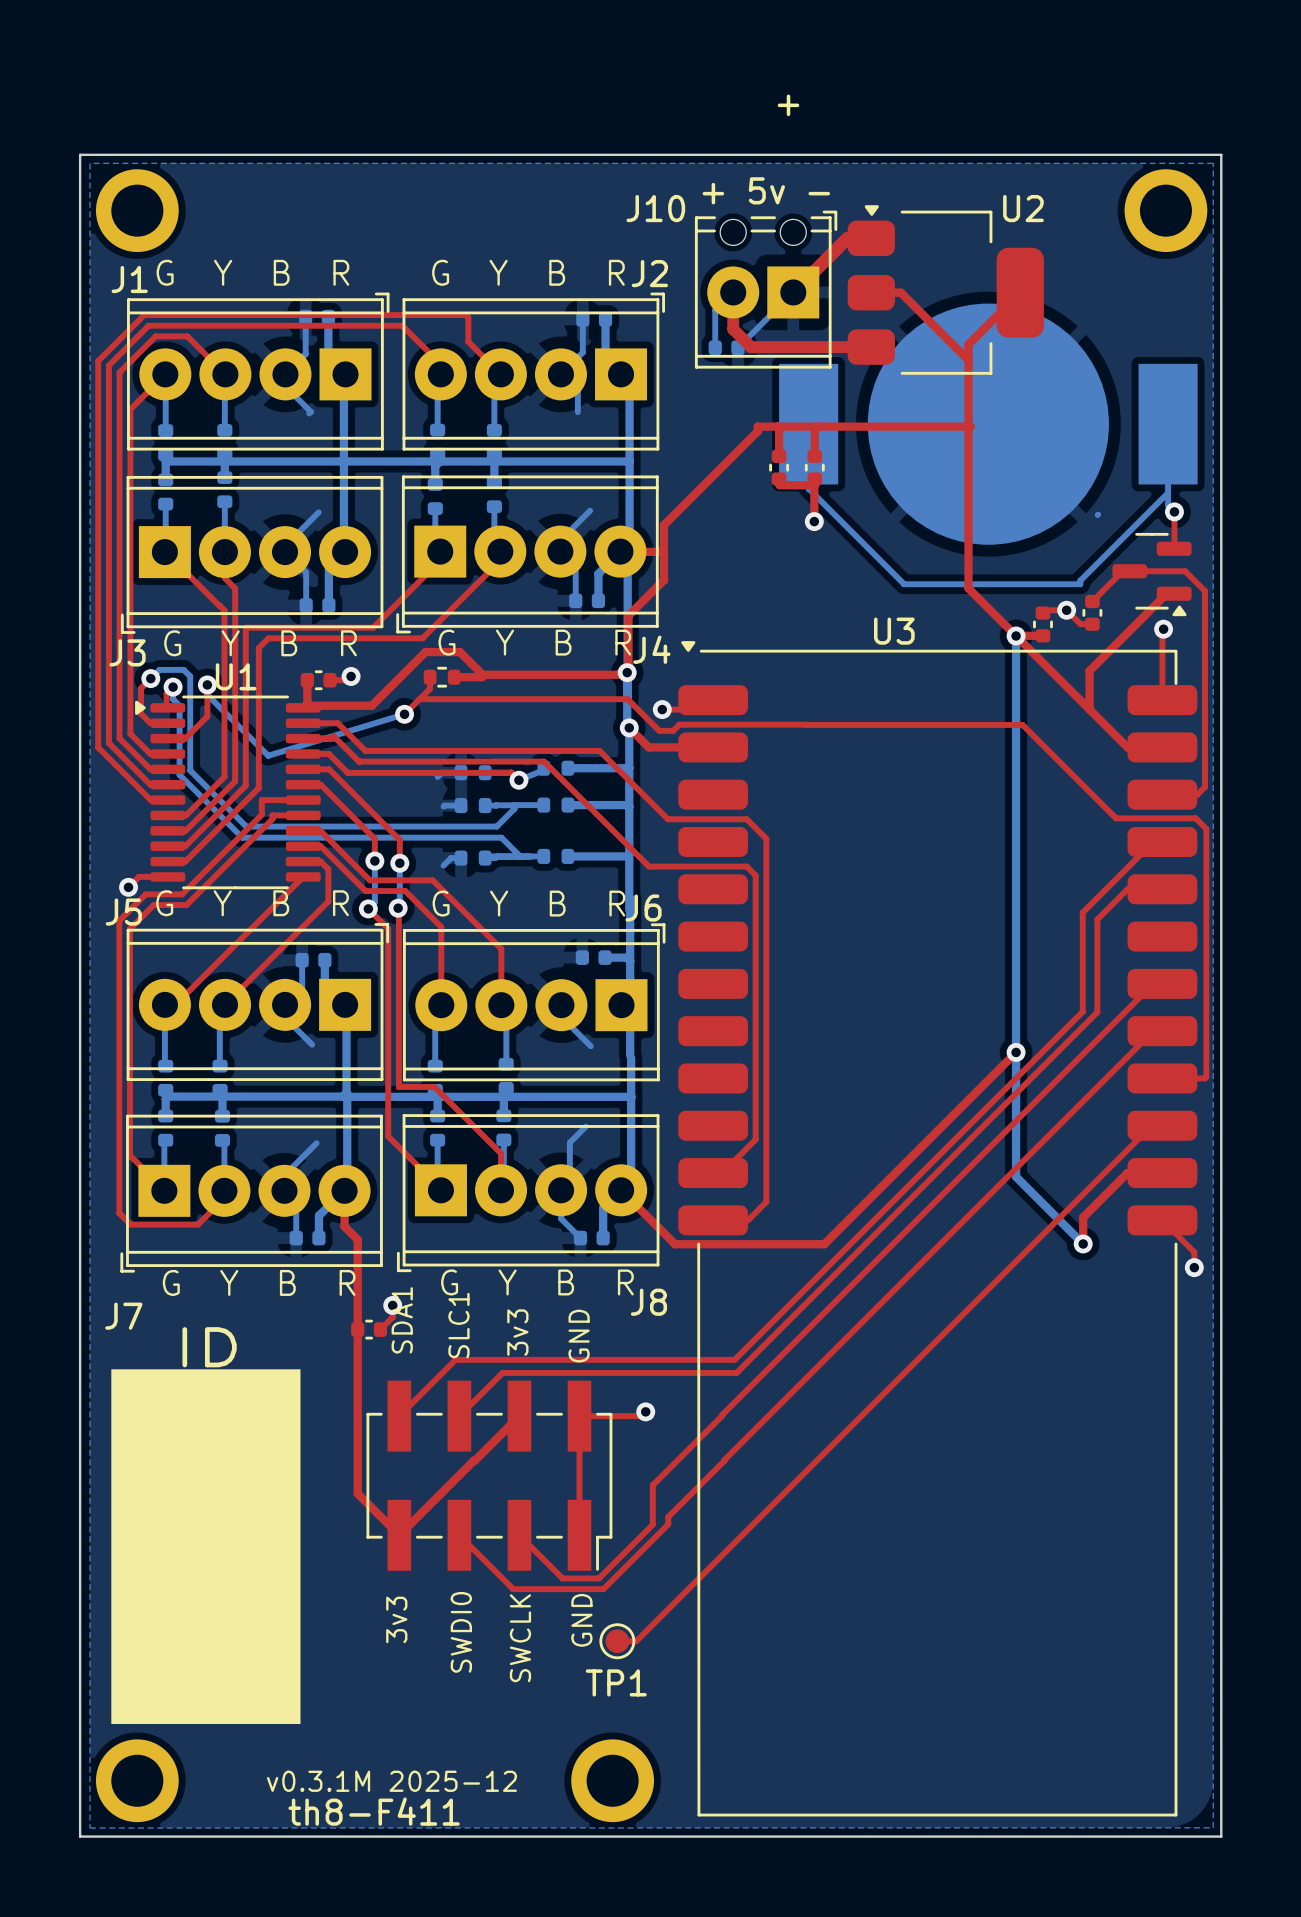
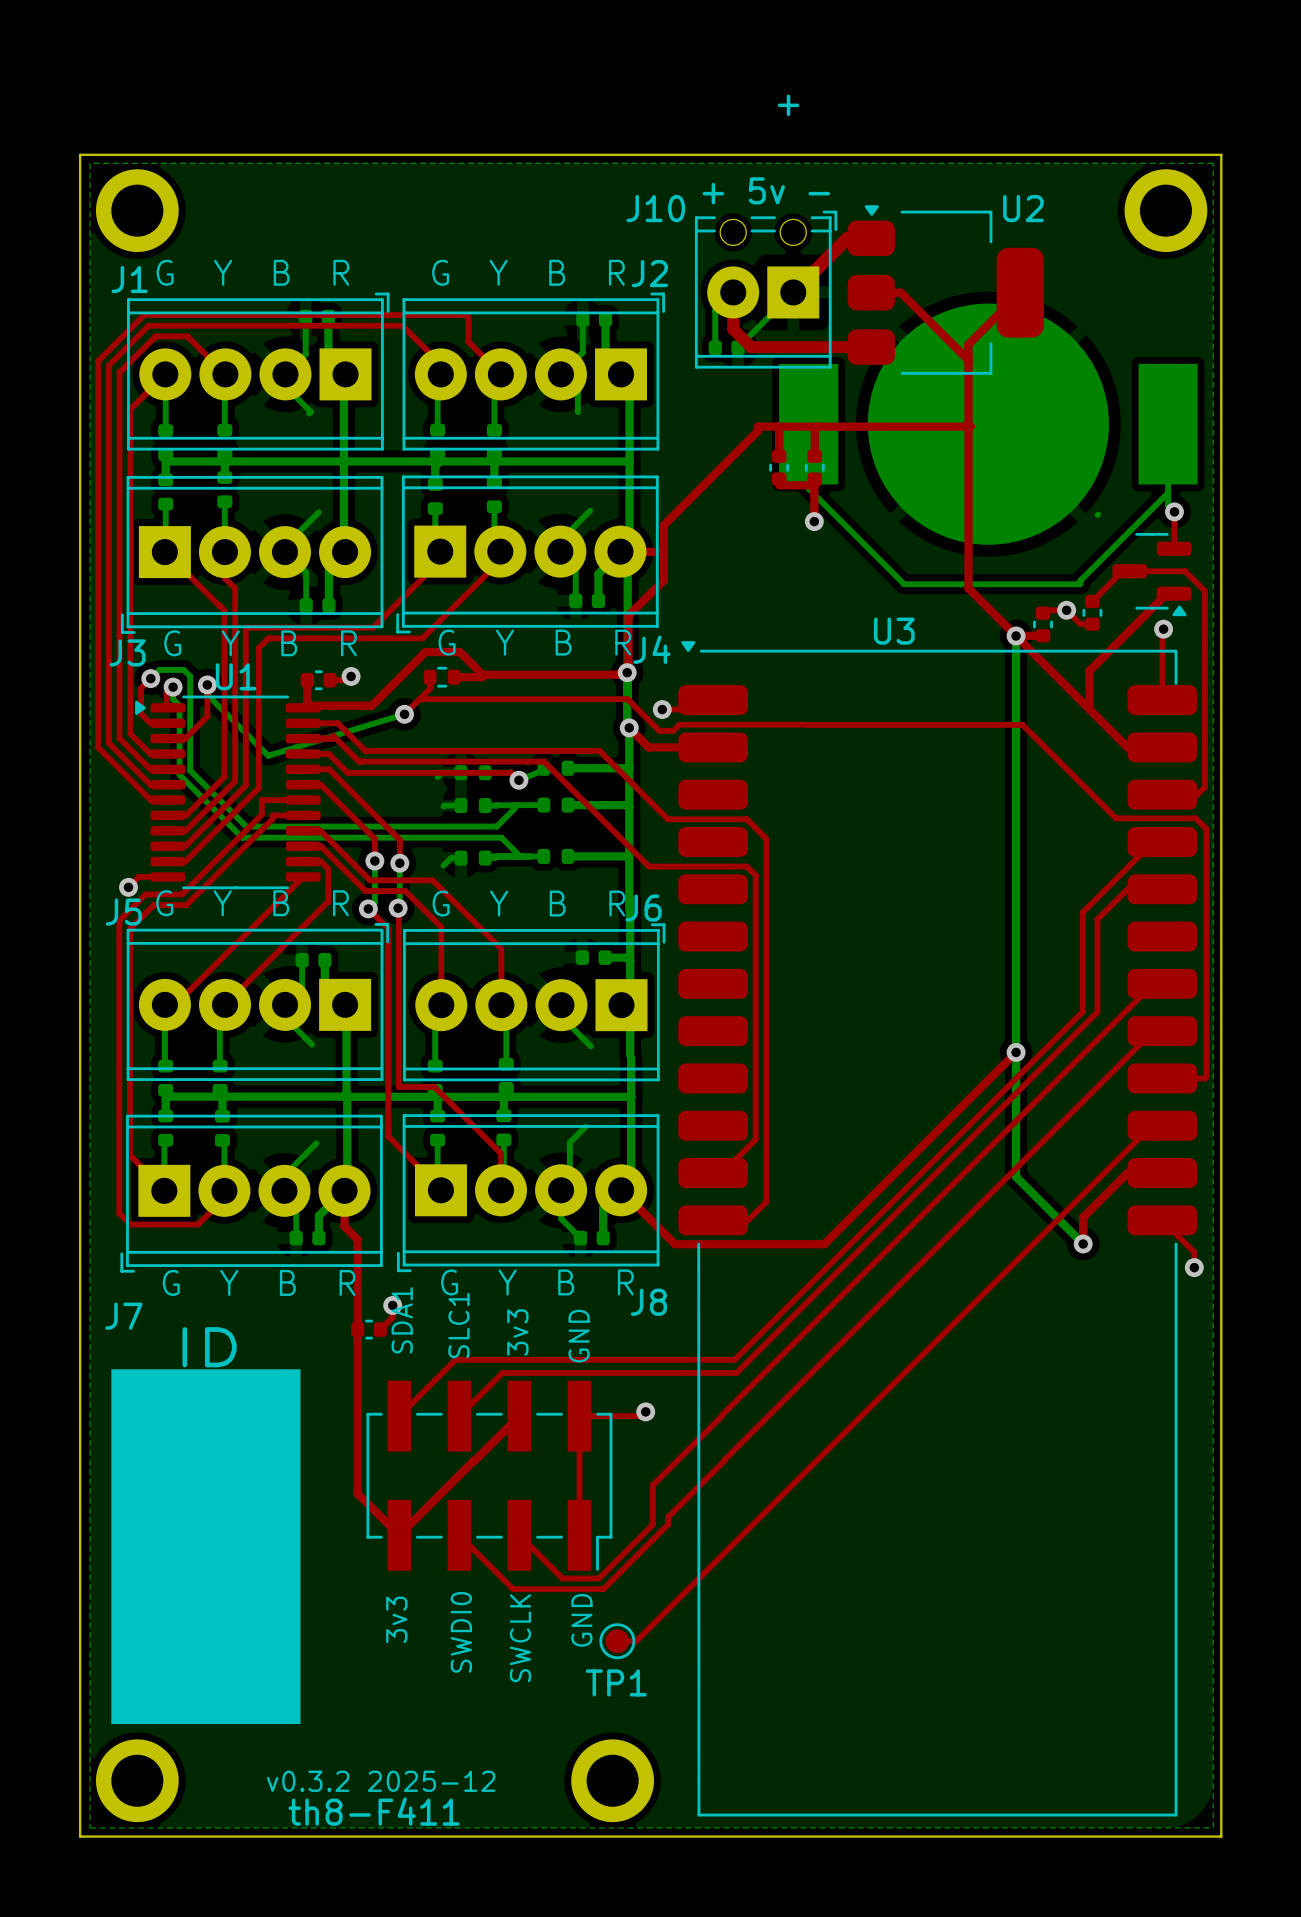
text: v0.3.1M 2025-12 (391, 1781) -> v0.3.2 2025-12 (381, 1781)

